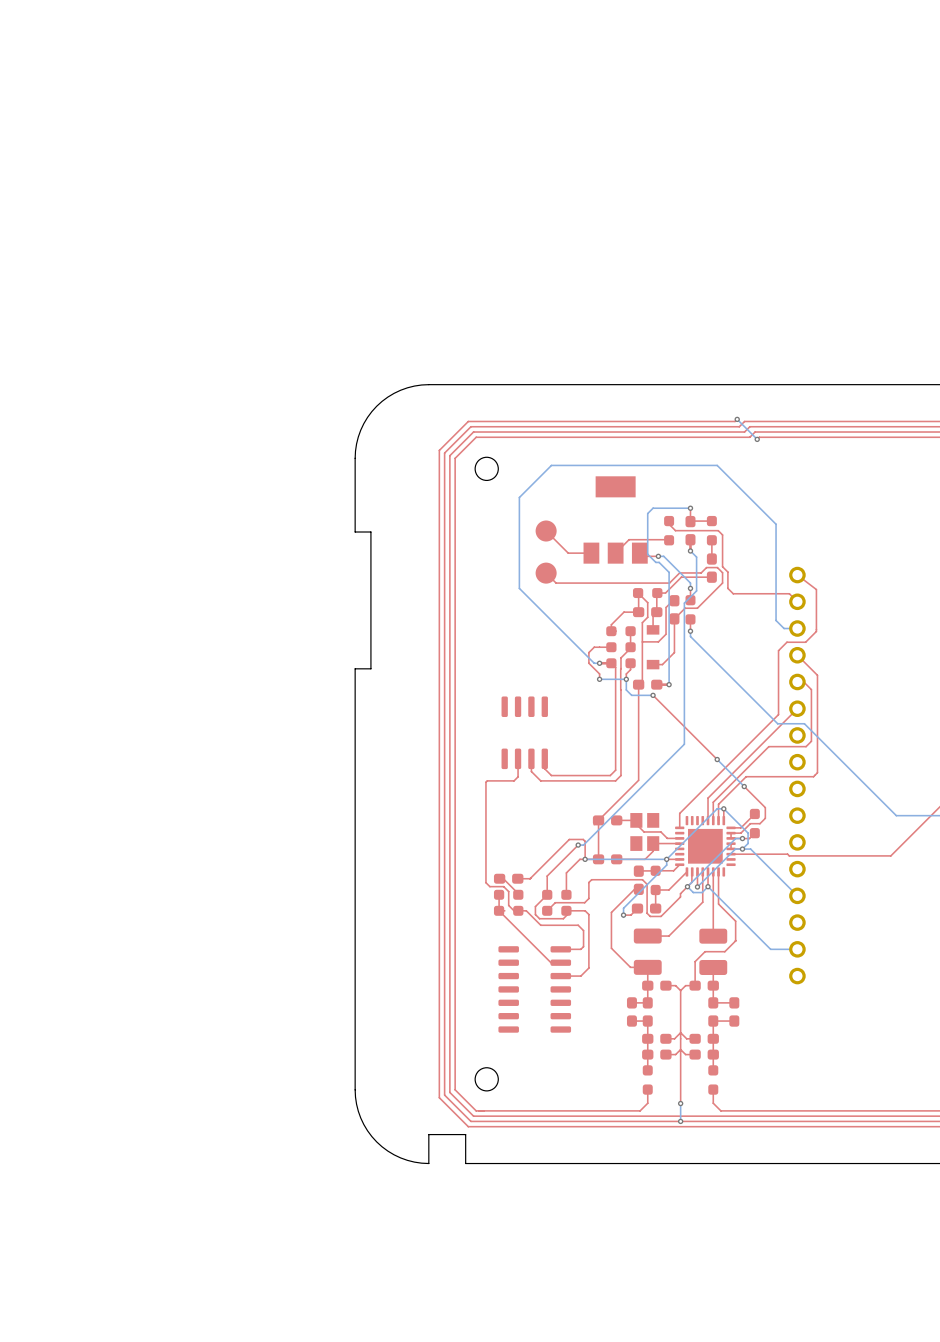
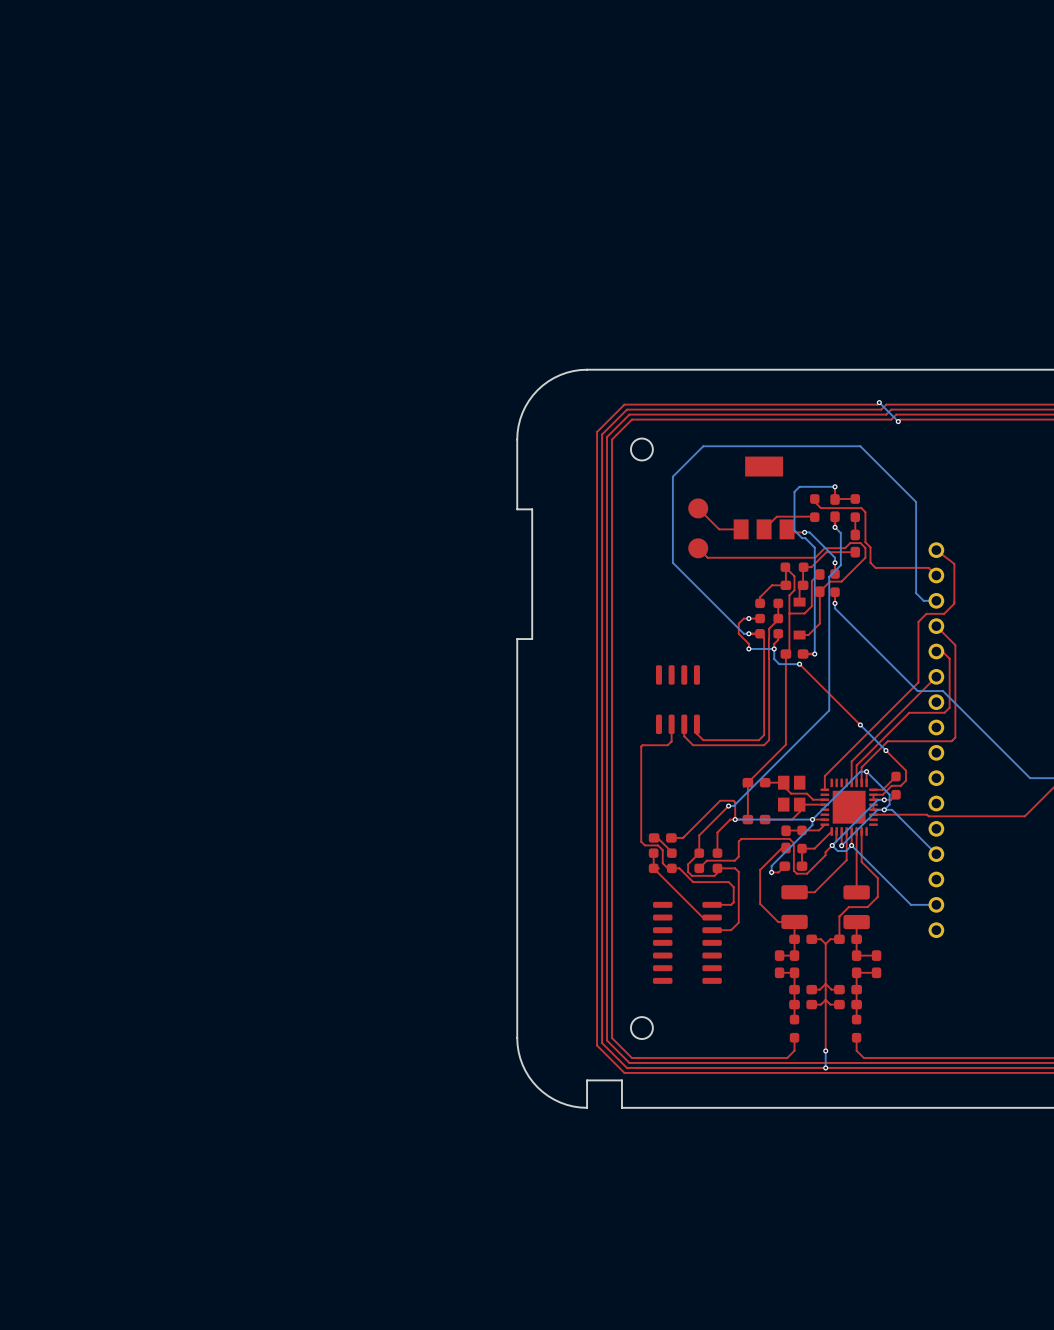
via: none -> (748, 618)

